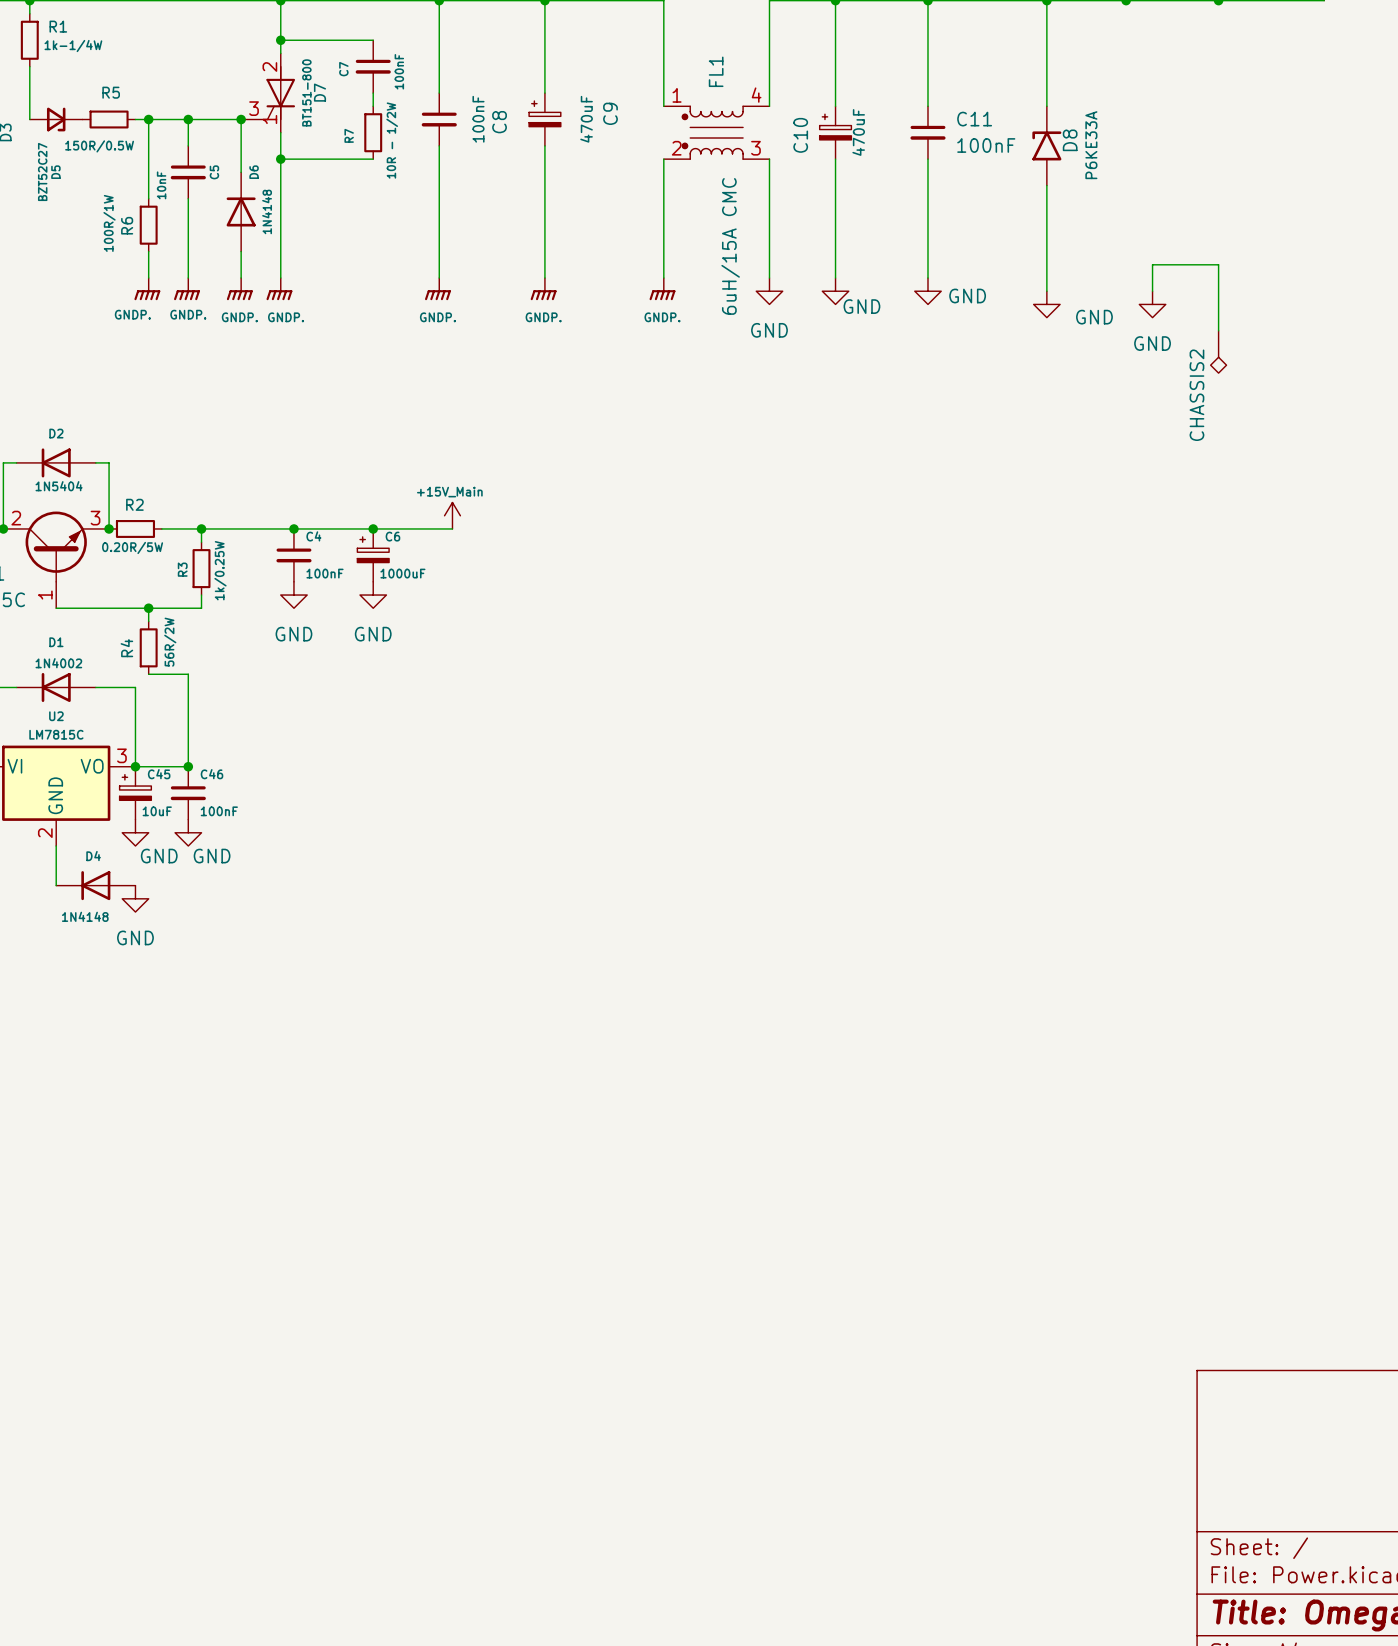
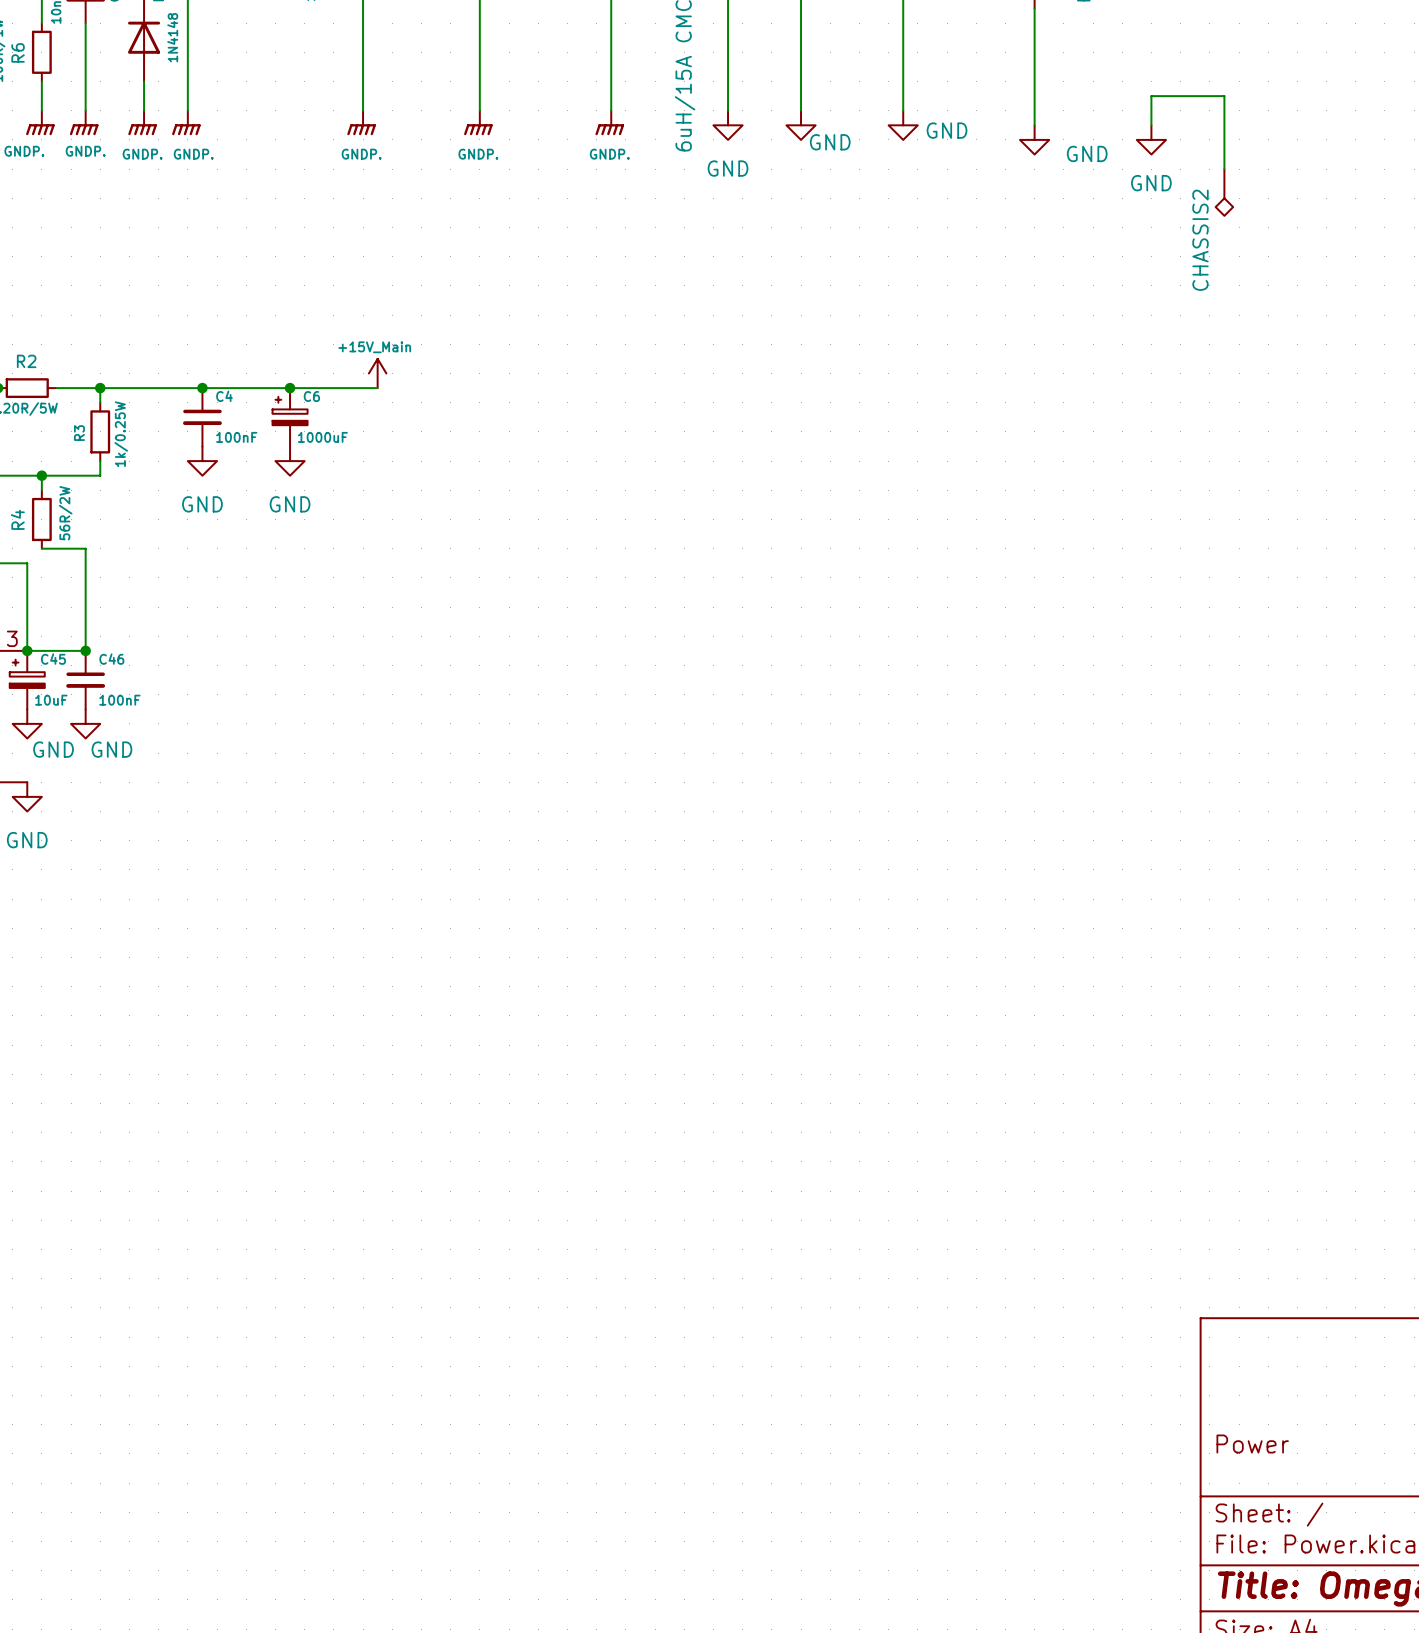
title block: none -> Power (1252, 1444)

